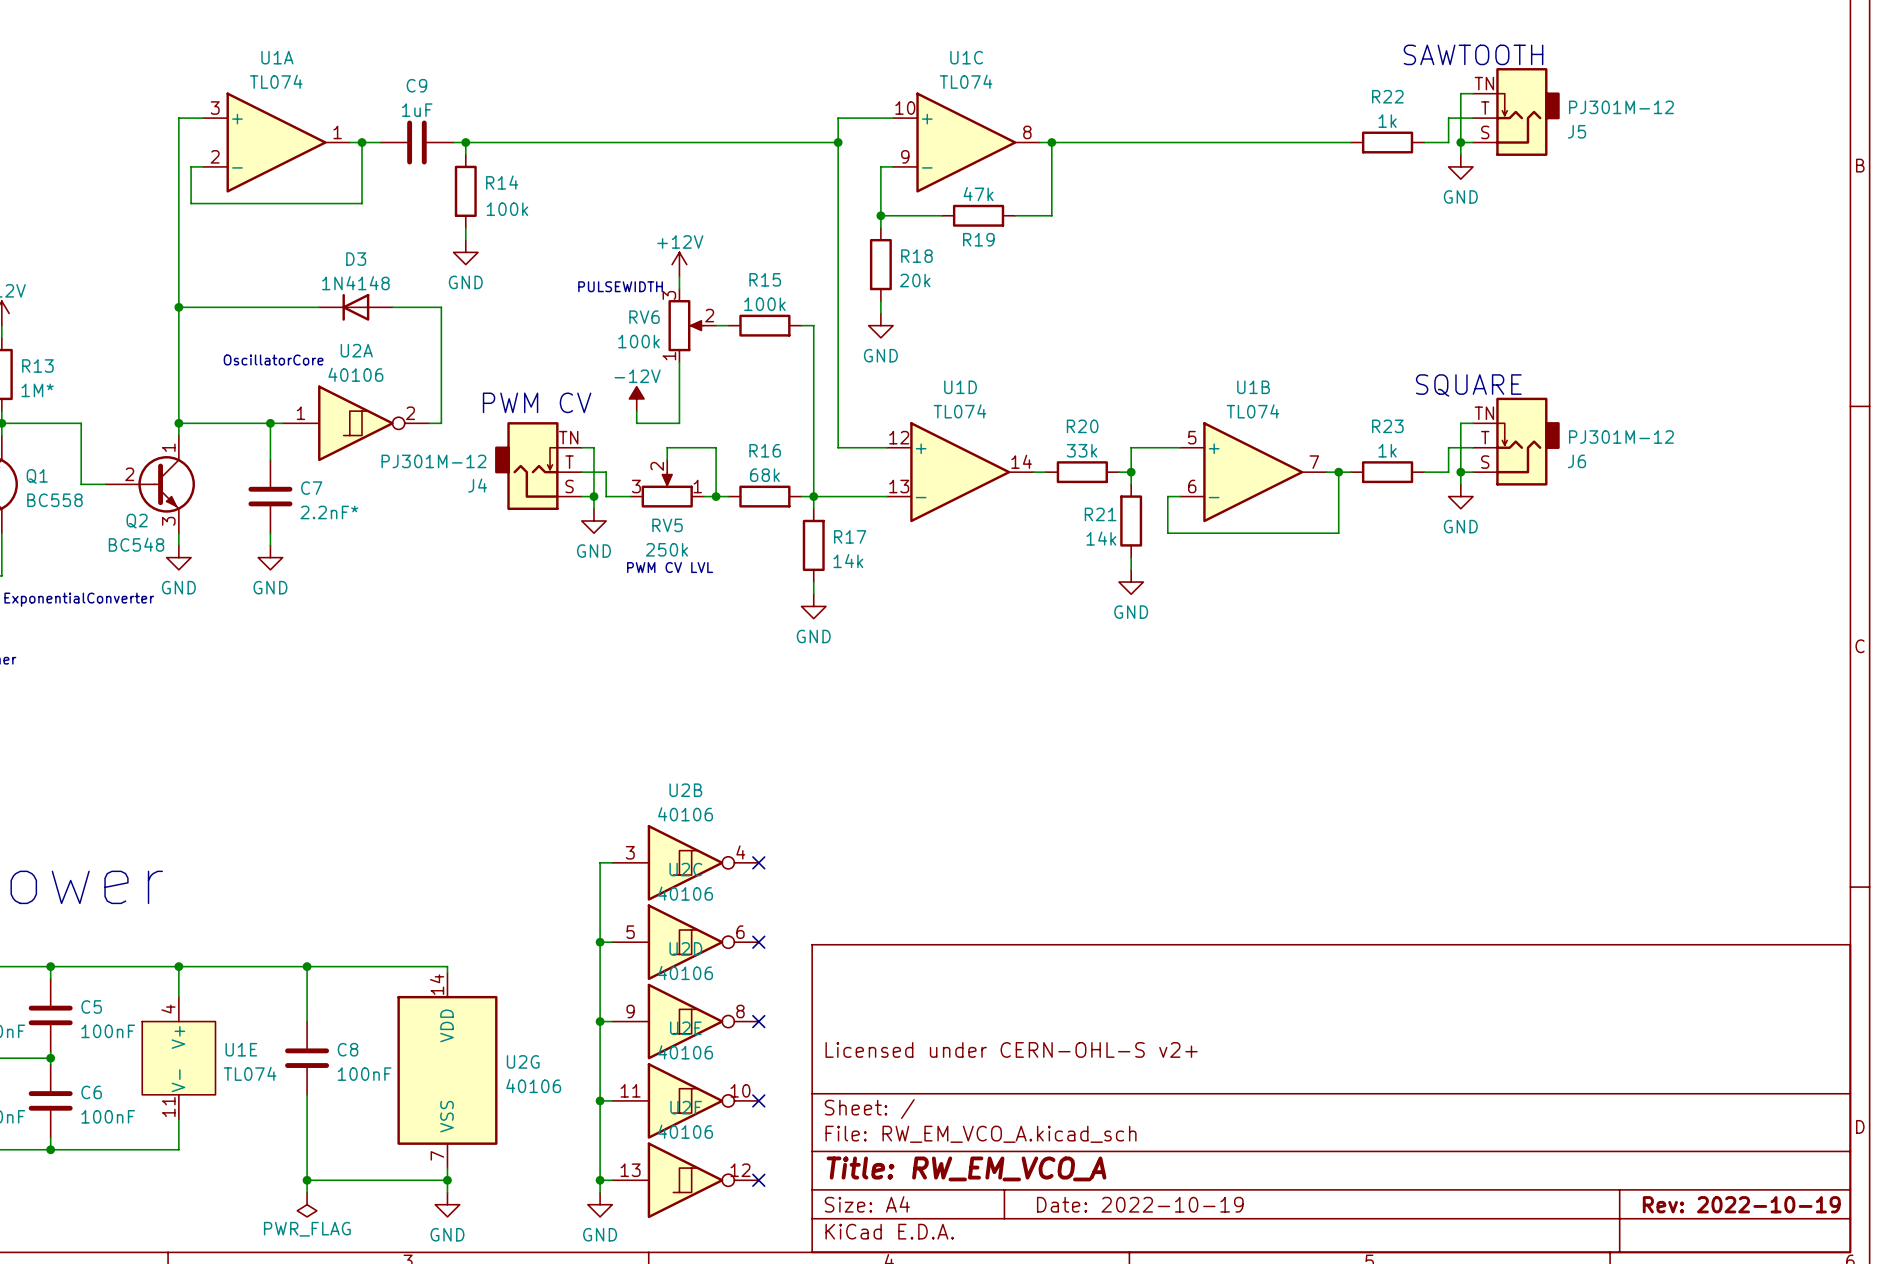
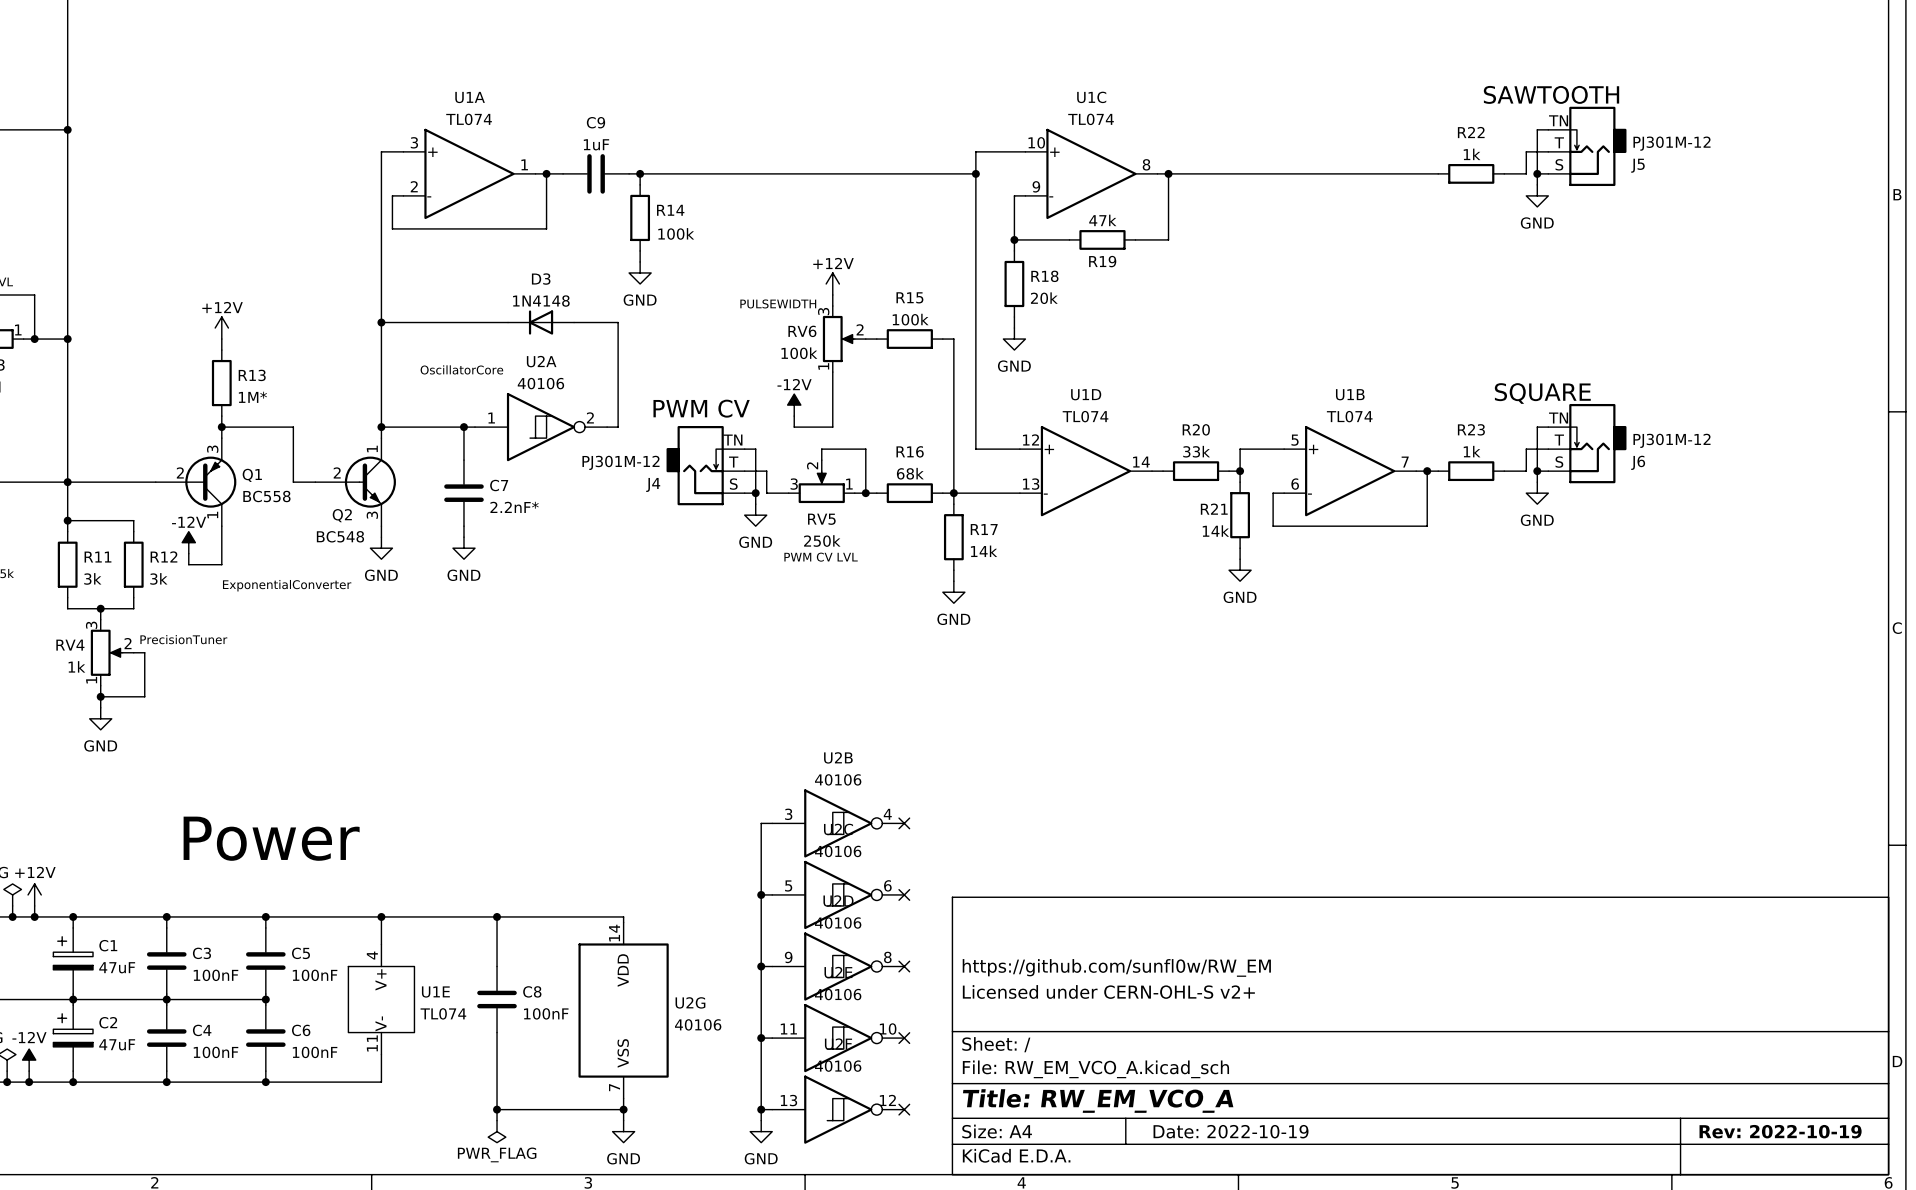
title block: none -> https://github.com/sunfl0w/RW_EM (1116, 967)

